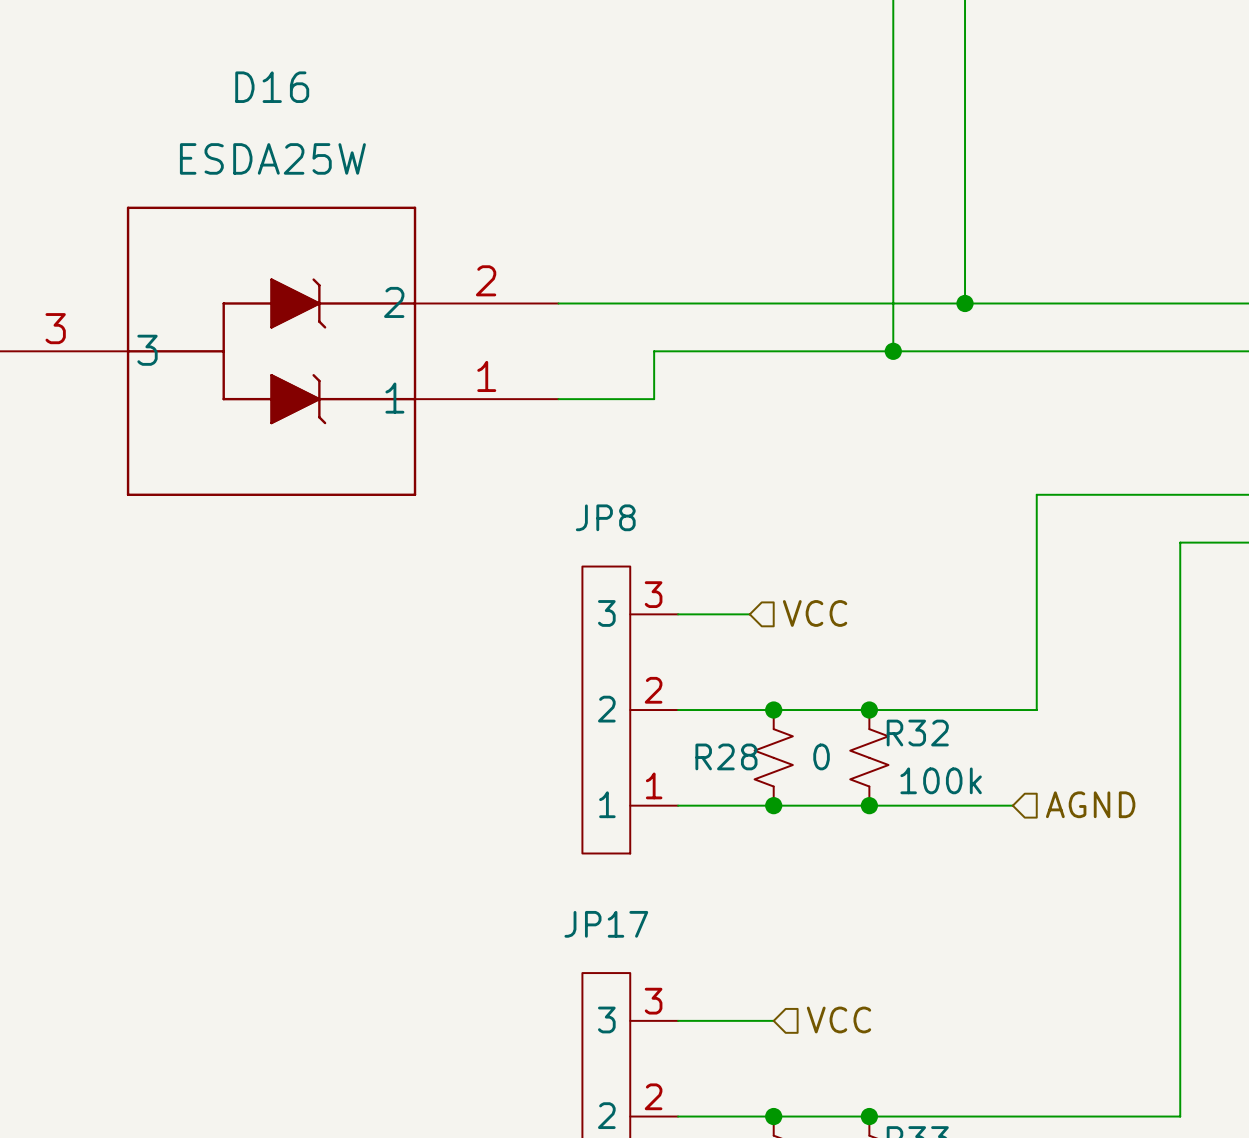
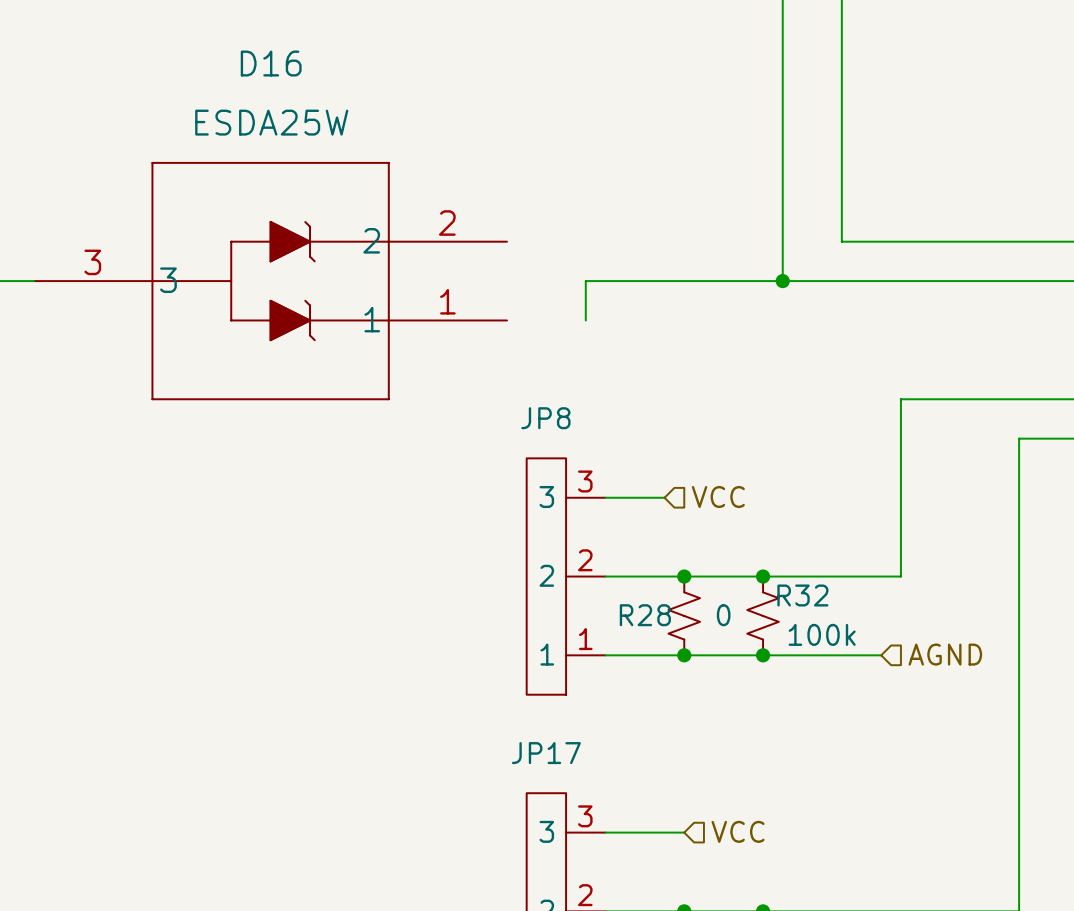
wire: (558, 303) (965, 303) -> none
junction: (965, 303) -> none
wire: (558, 399) (654, 399) -> none

